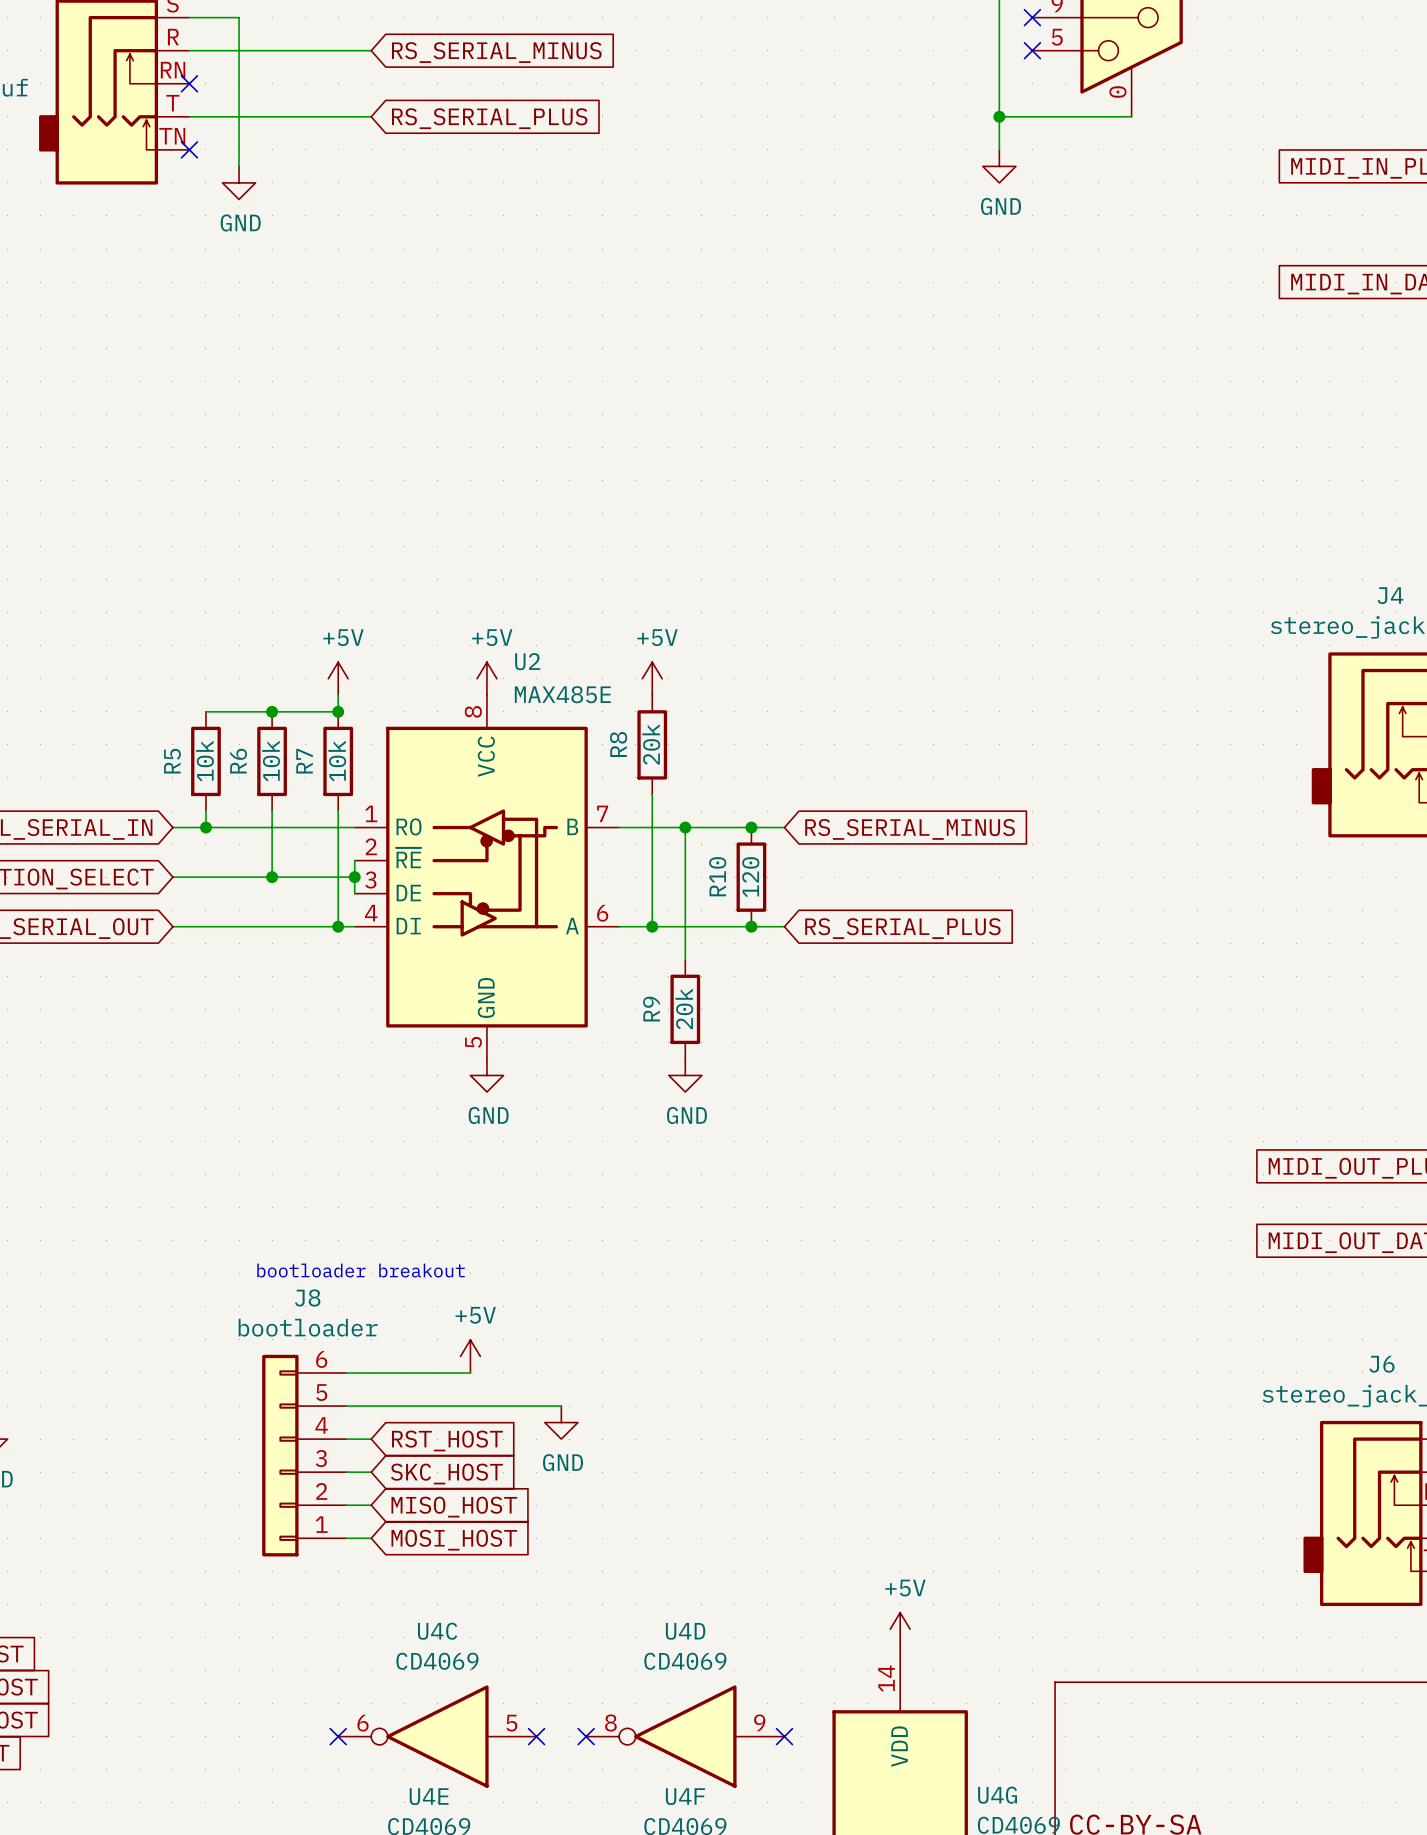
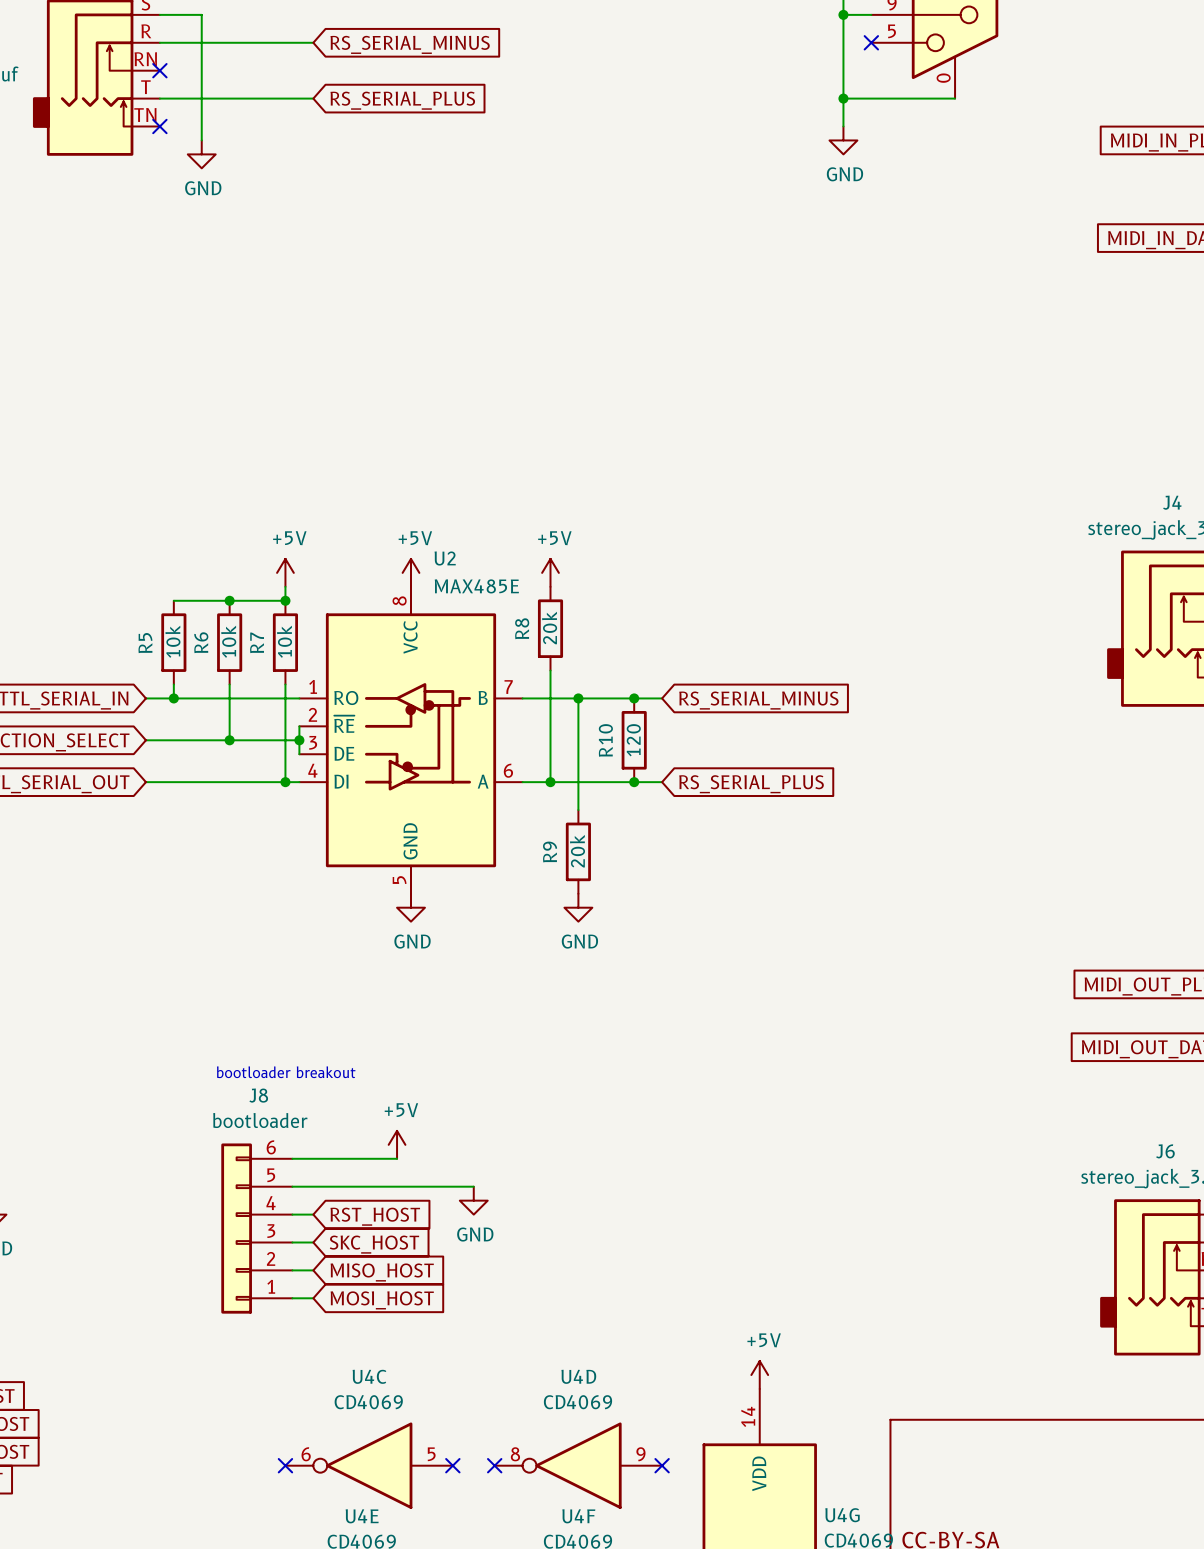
wire: none -> (843, 14) (871, 14)
junction: none -> (843, 14)
no-connect mark: (1032, 17) -> none

